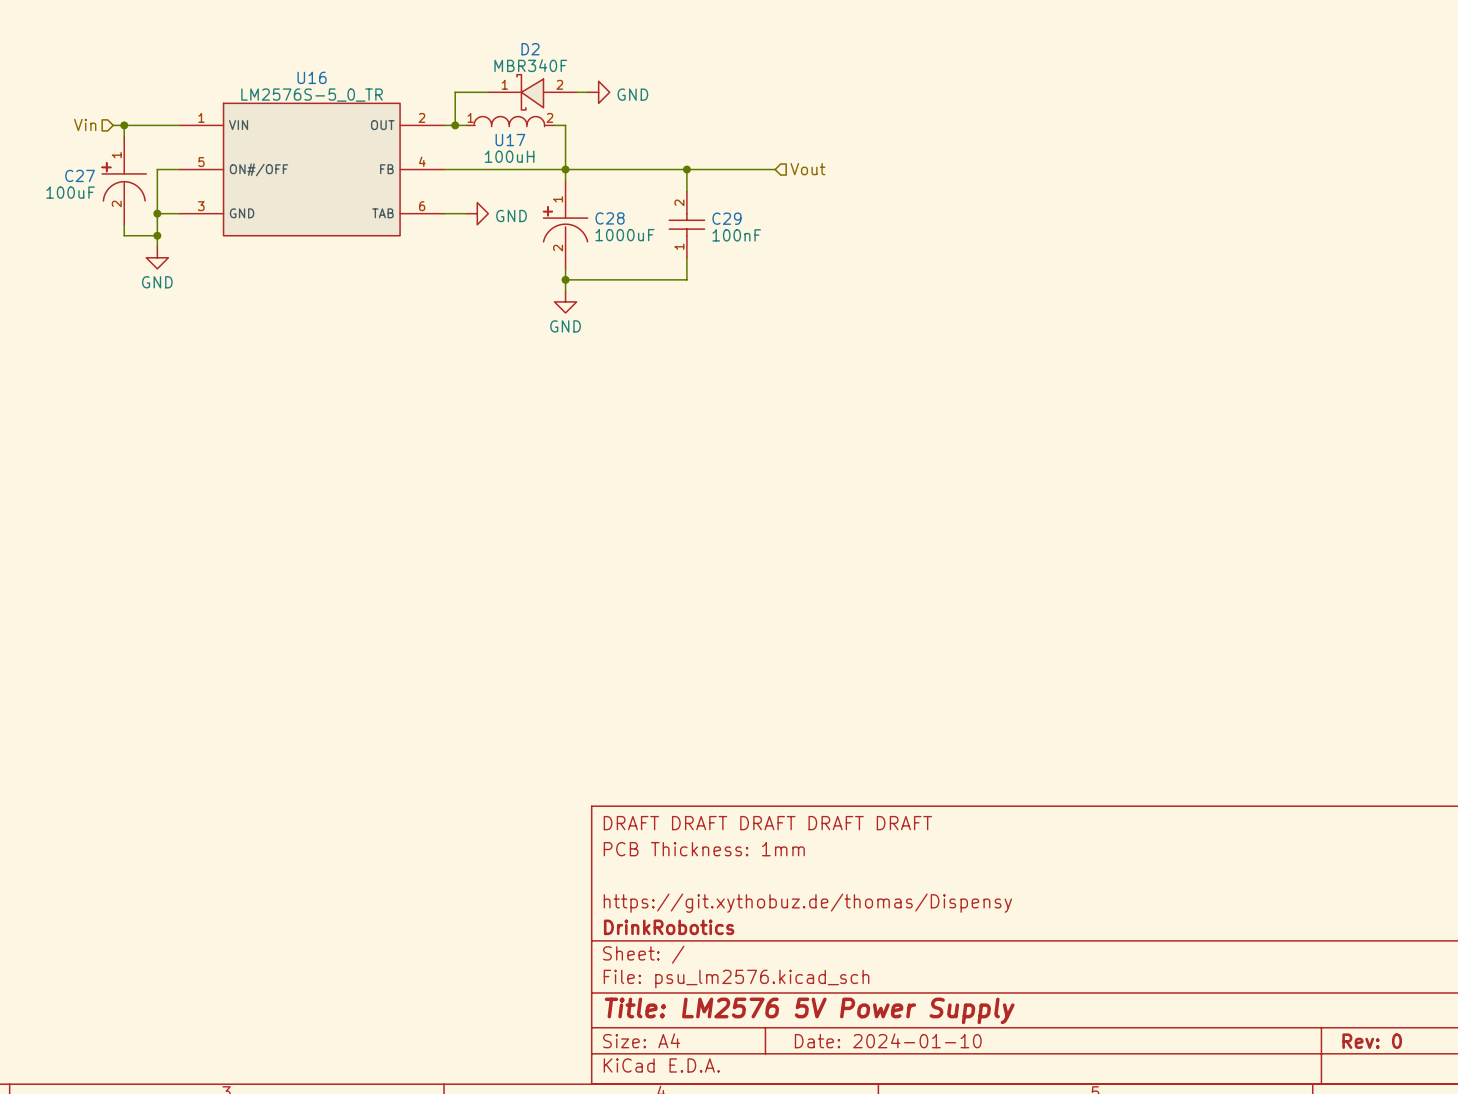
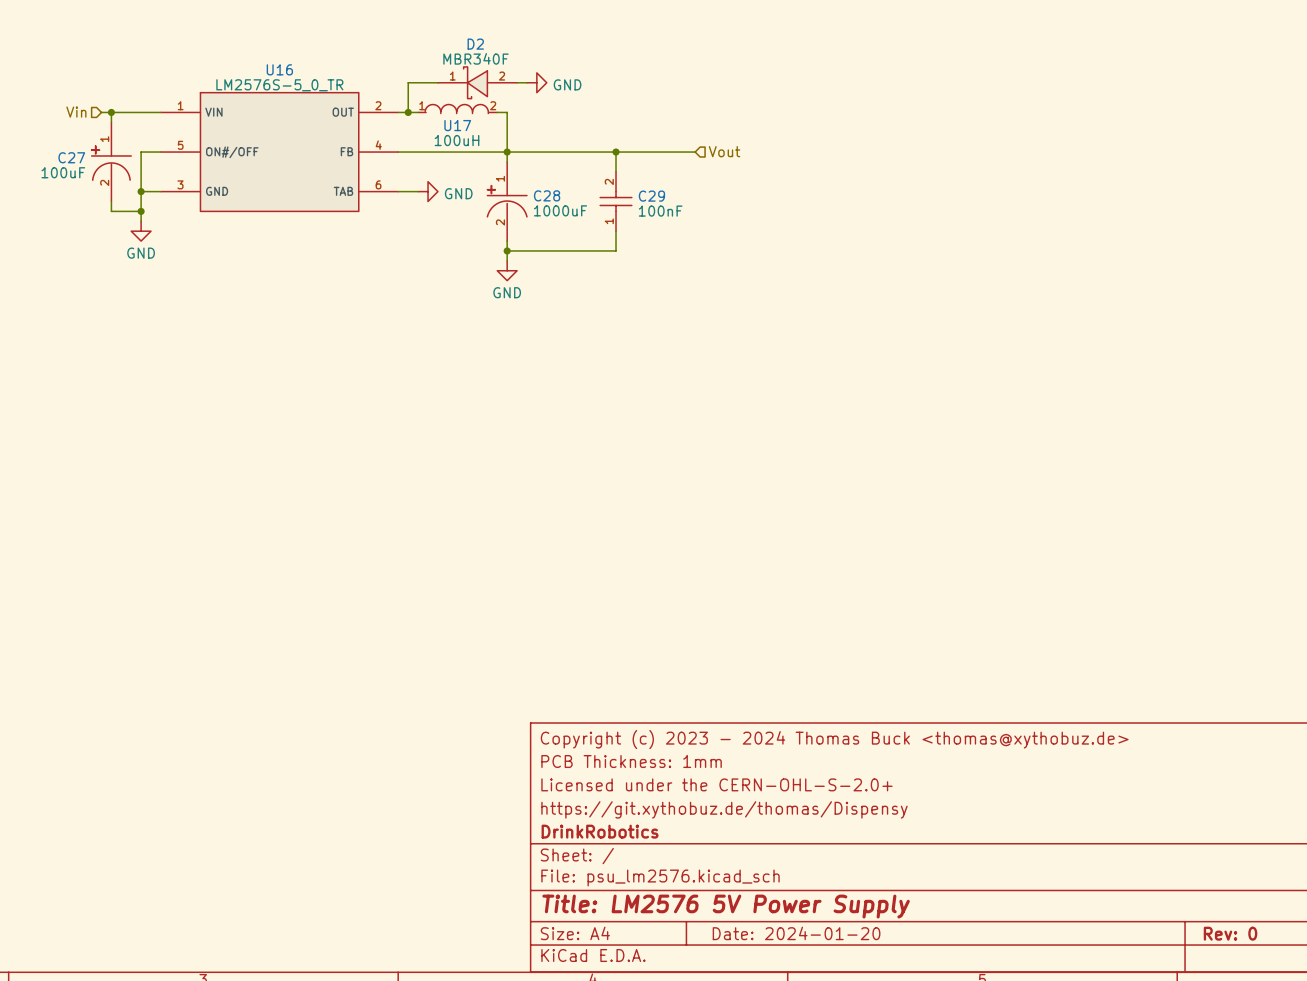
title block: DRAFT DRAFT DRAFT DRAFT DRAFT (767, 823) -> Copyright (c) 2023 - 2024 Thomas Buck <thomas@xythobuz.de> (834, 739)
title block: none -> Licensed under the CERN-OHL-S-2.0+ (716, 784)
title block: Date: 2024-01-10 (888, 1040) -> Date: 2024-01-20 (796, 933)

